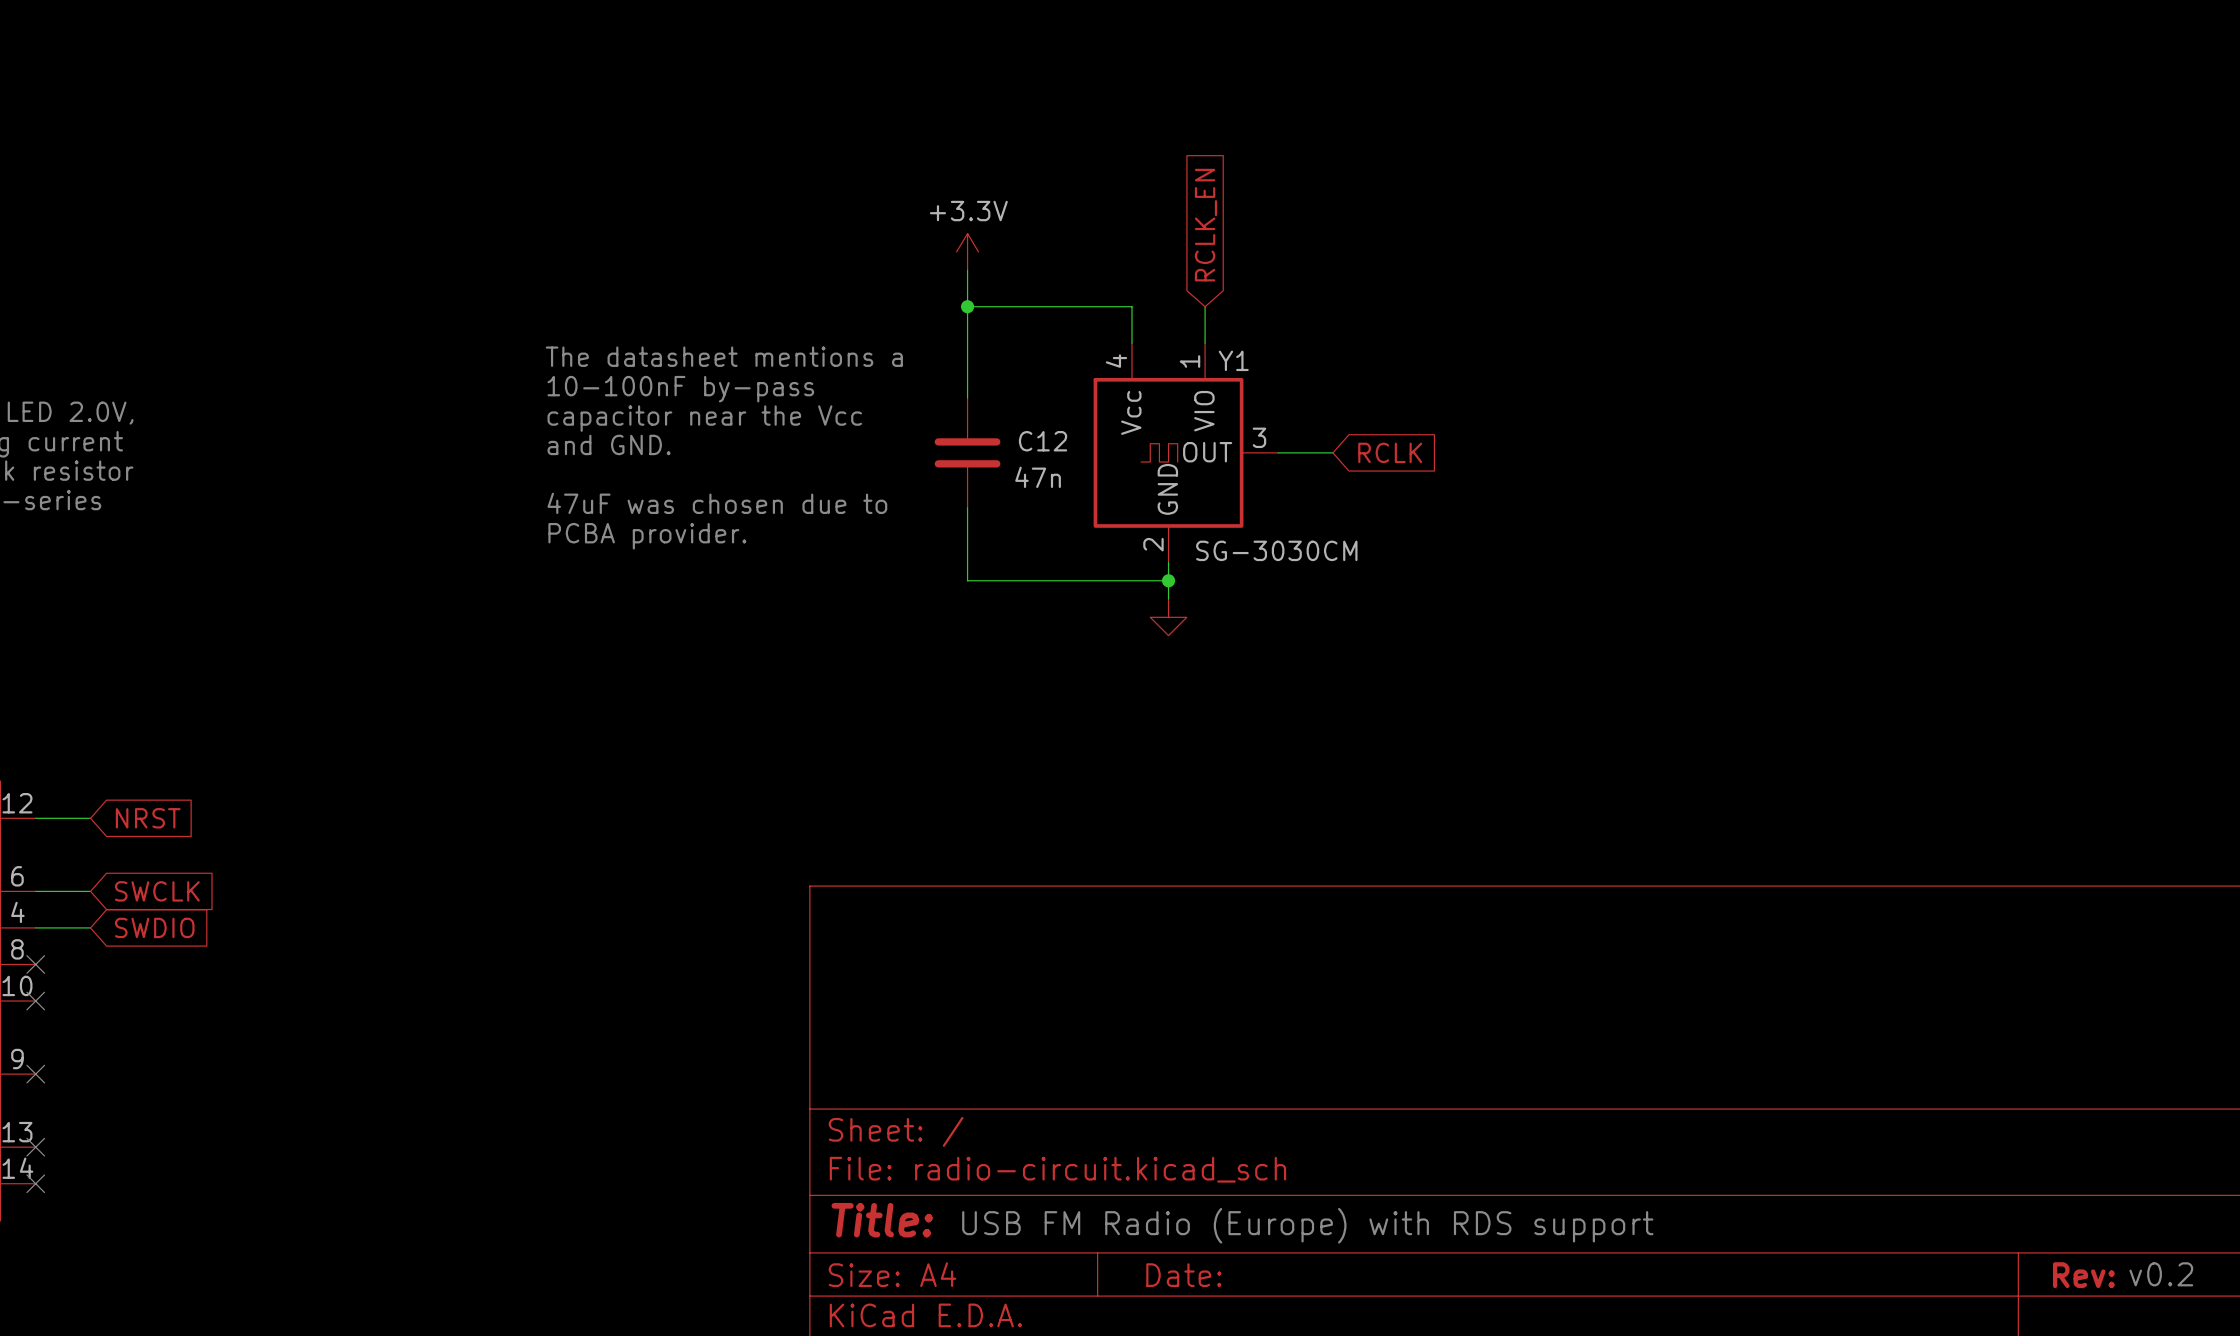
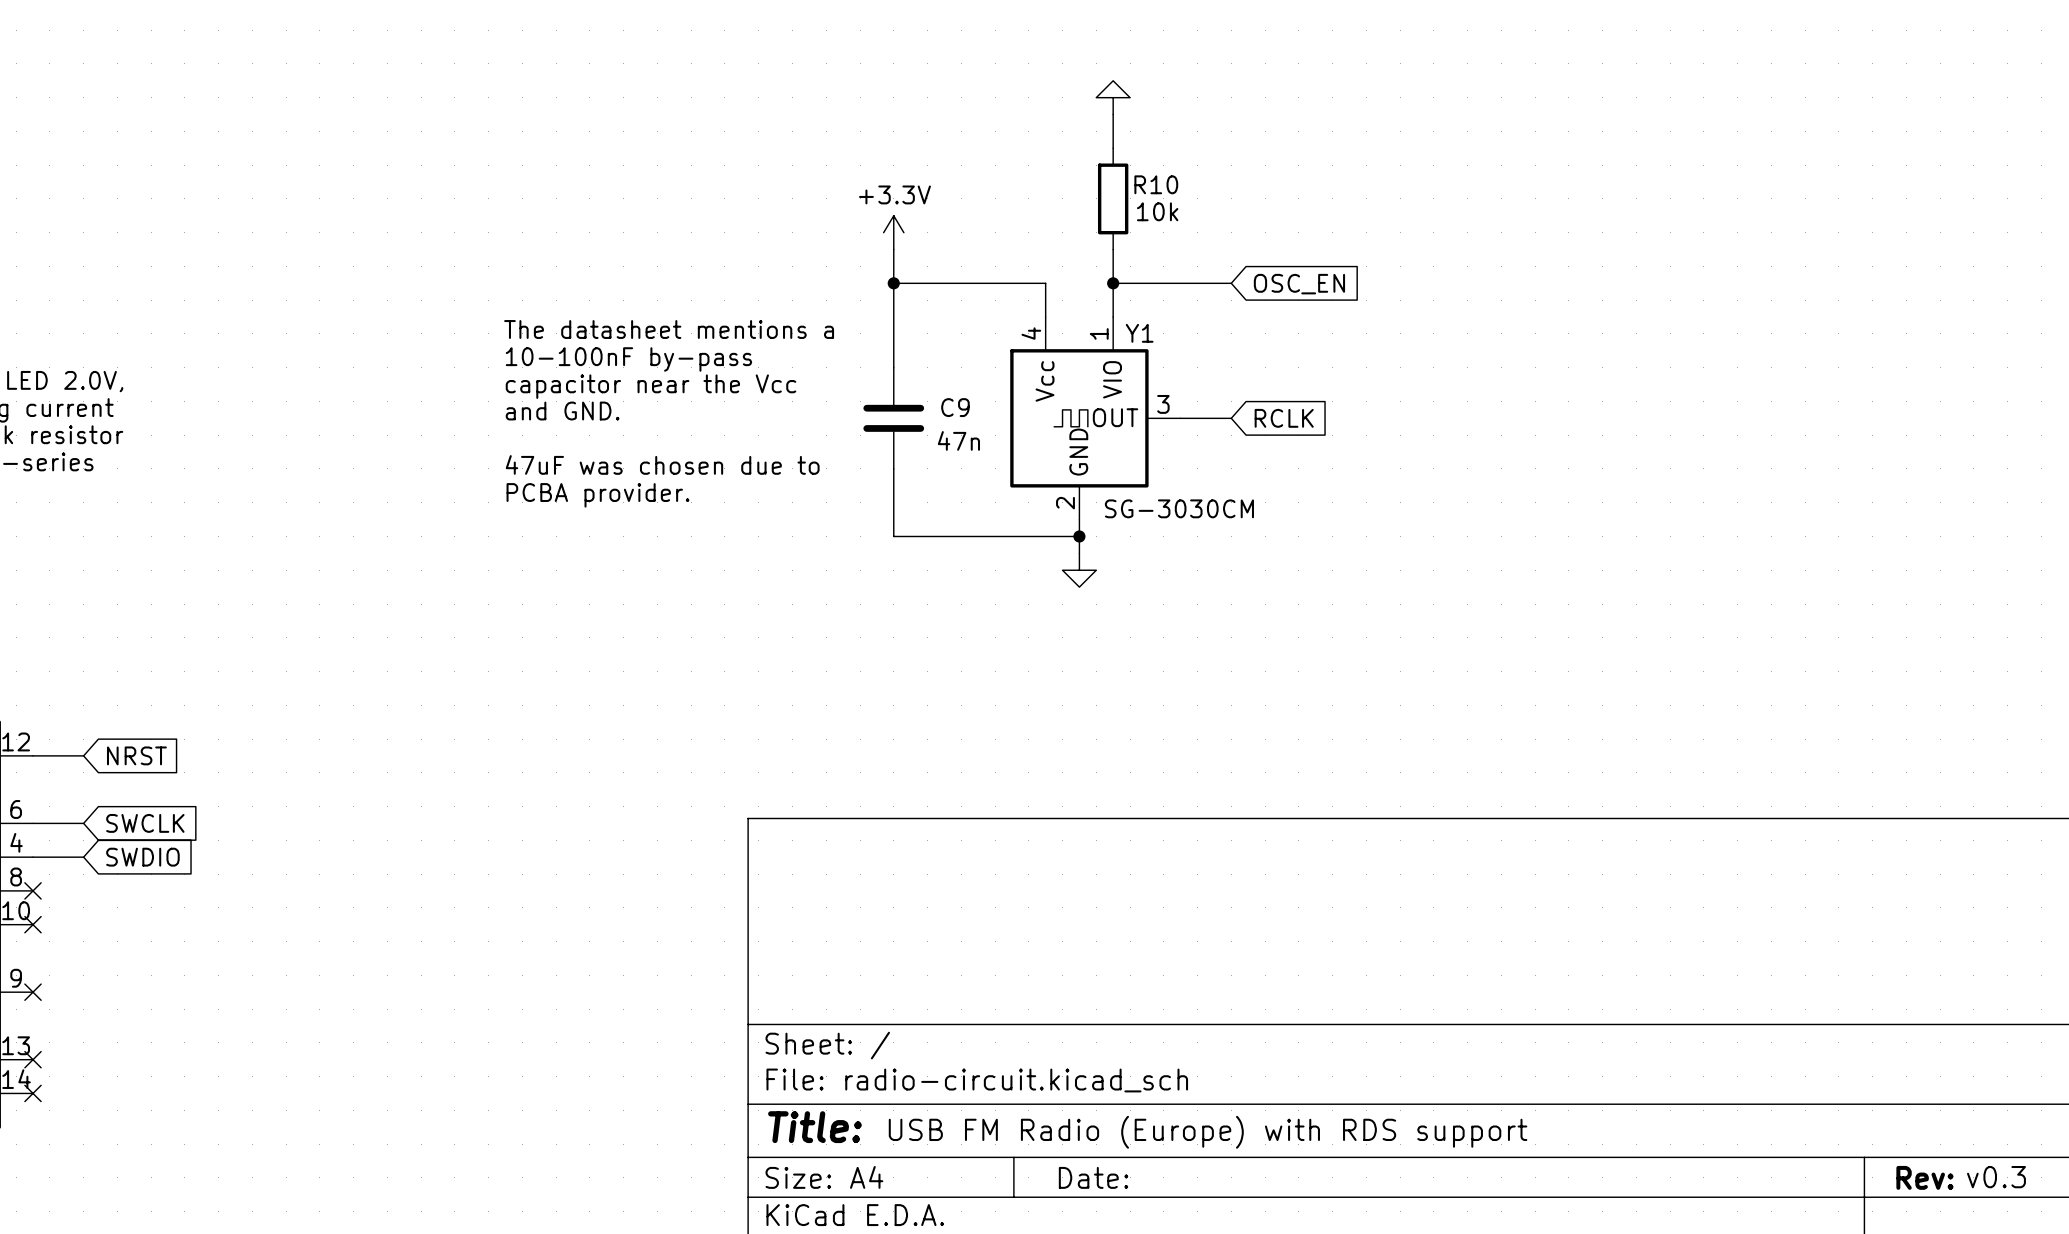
power symbol: none -> (1113, 97)
wire: none -> (1113, 114) (1113, 148)
R10: none -> 10k (1113, 198)
global label: RCLK_EN (1205, 225) -> none
wire: none -> (1113, 249) (1113, 283) (1231, 283)
junction: none -> (1113, 283)
global label: none -> OSC_EN (1299, 284)
C12 name: C12 (1043, 441) -> C9 (955, 407)
text: v0.2 (2161, 1274) -> v0.3 (1996, 1177)

